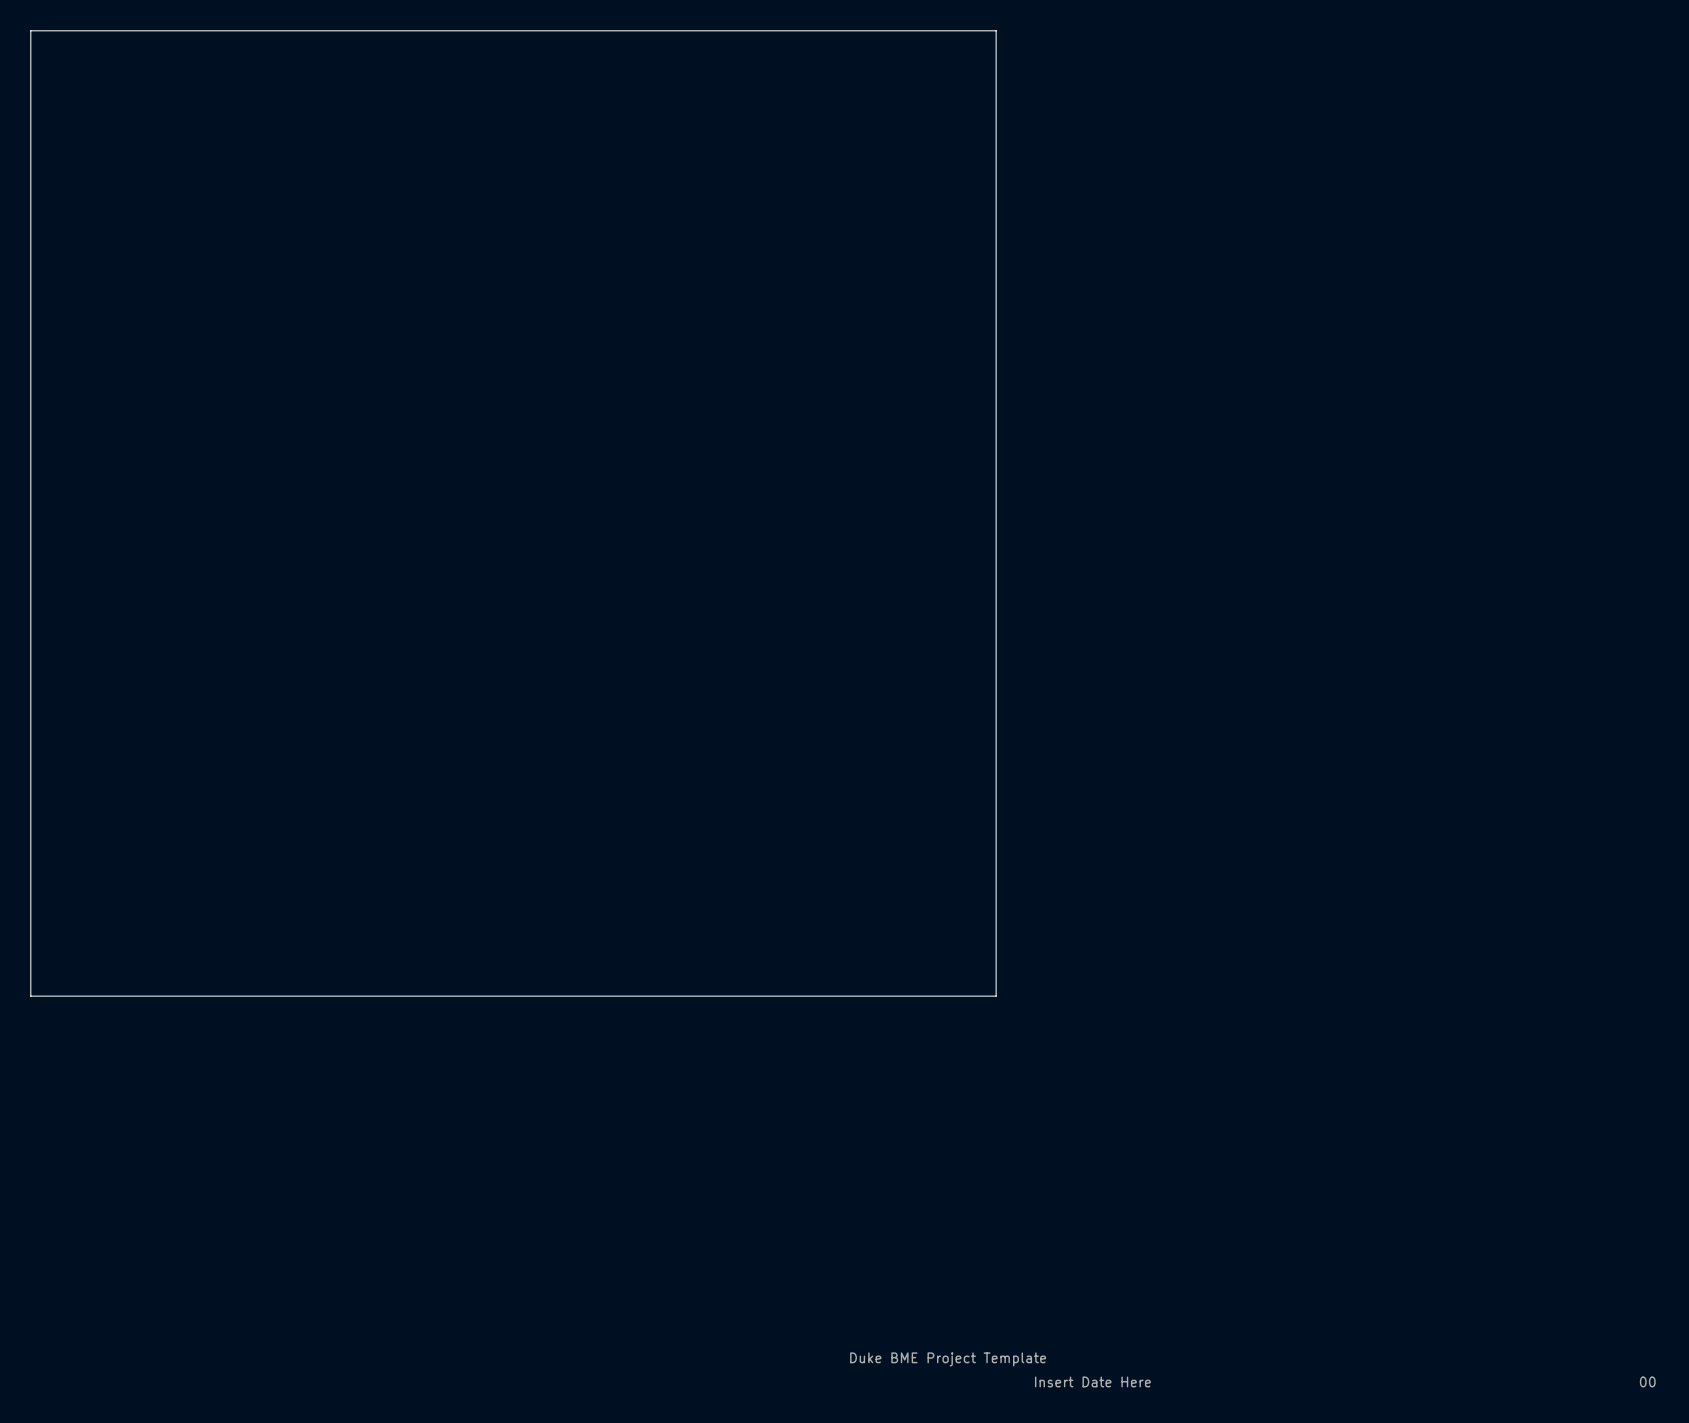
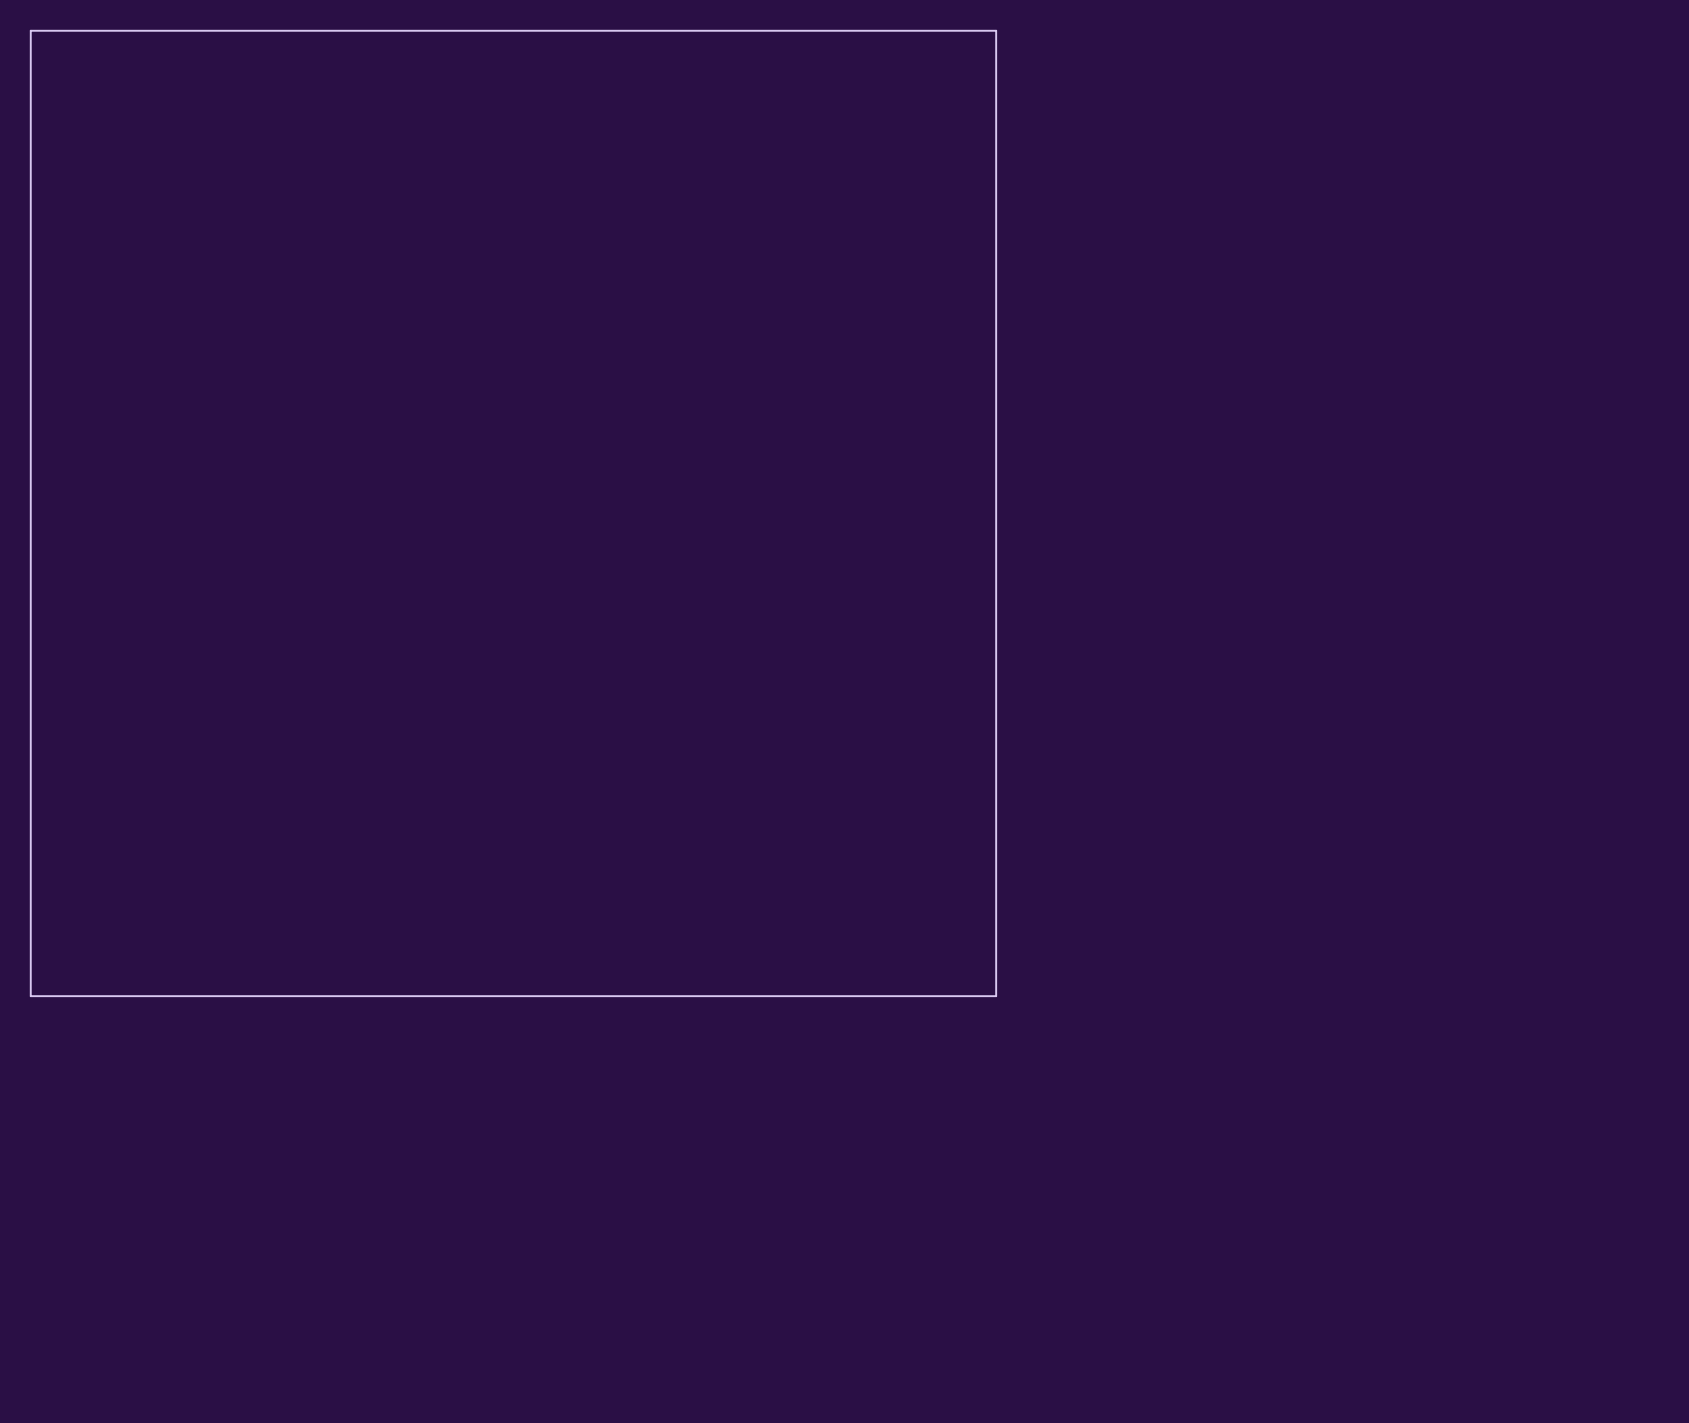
text: Duke BME Project Template (948, 1359) -> none
text: Insert Date Here (1092, 1381) -> none
text: 00 (1647, 1381) -> none

